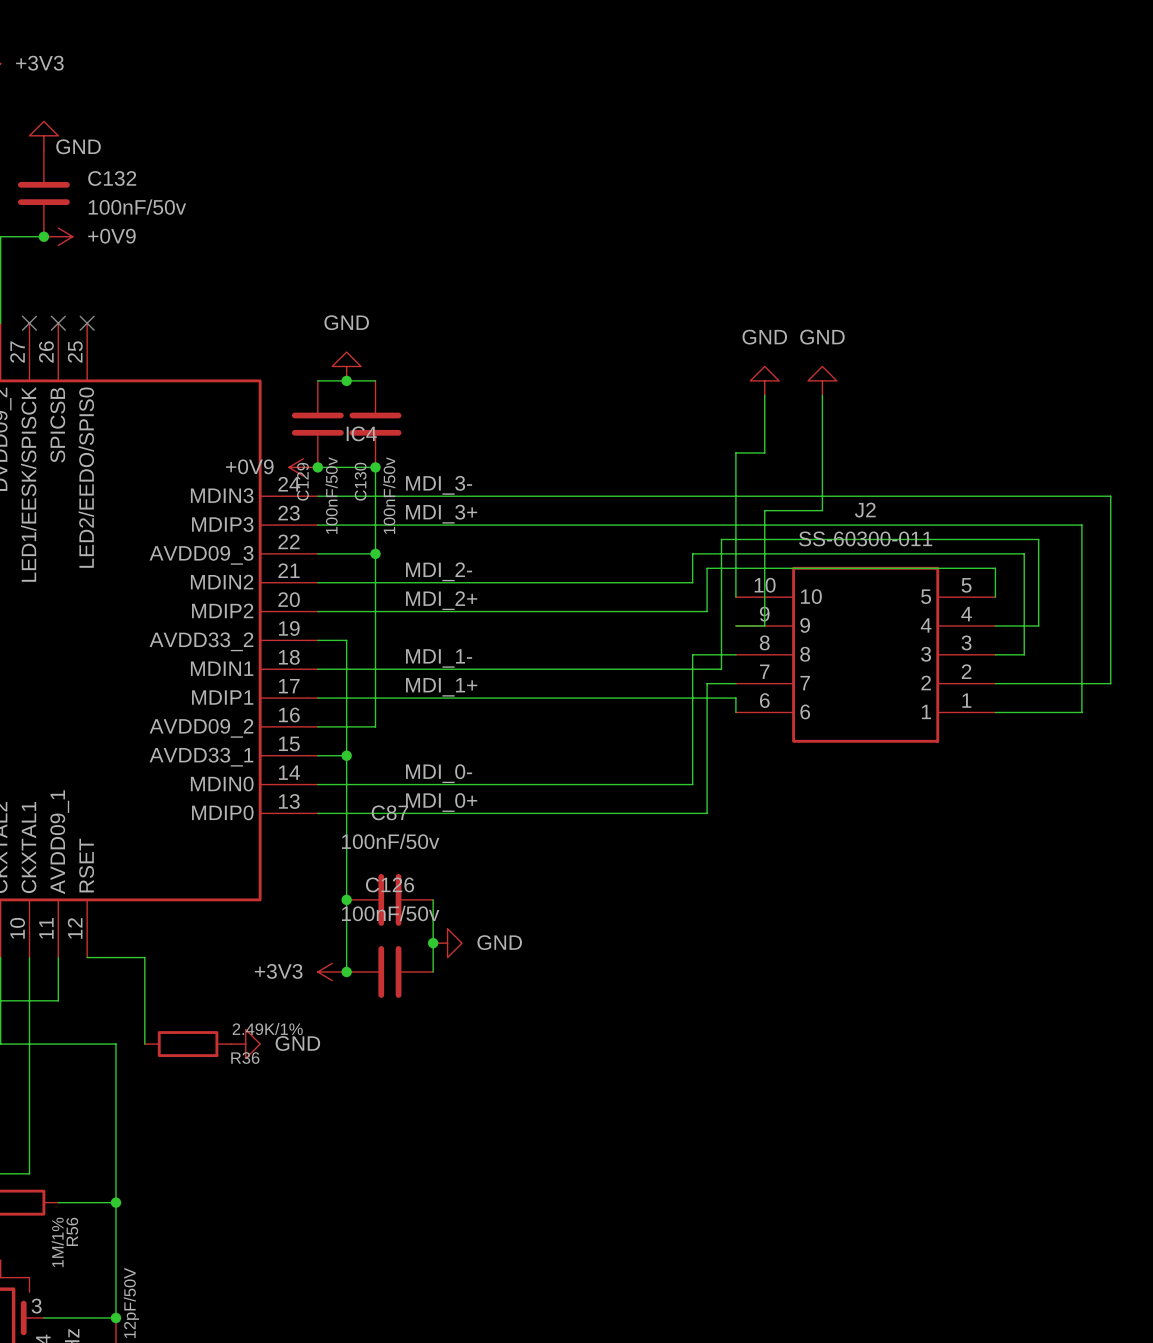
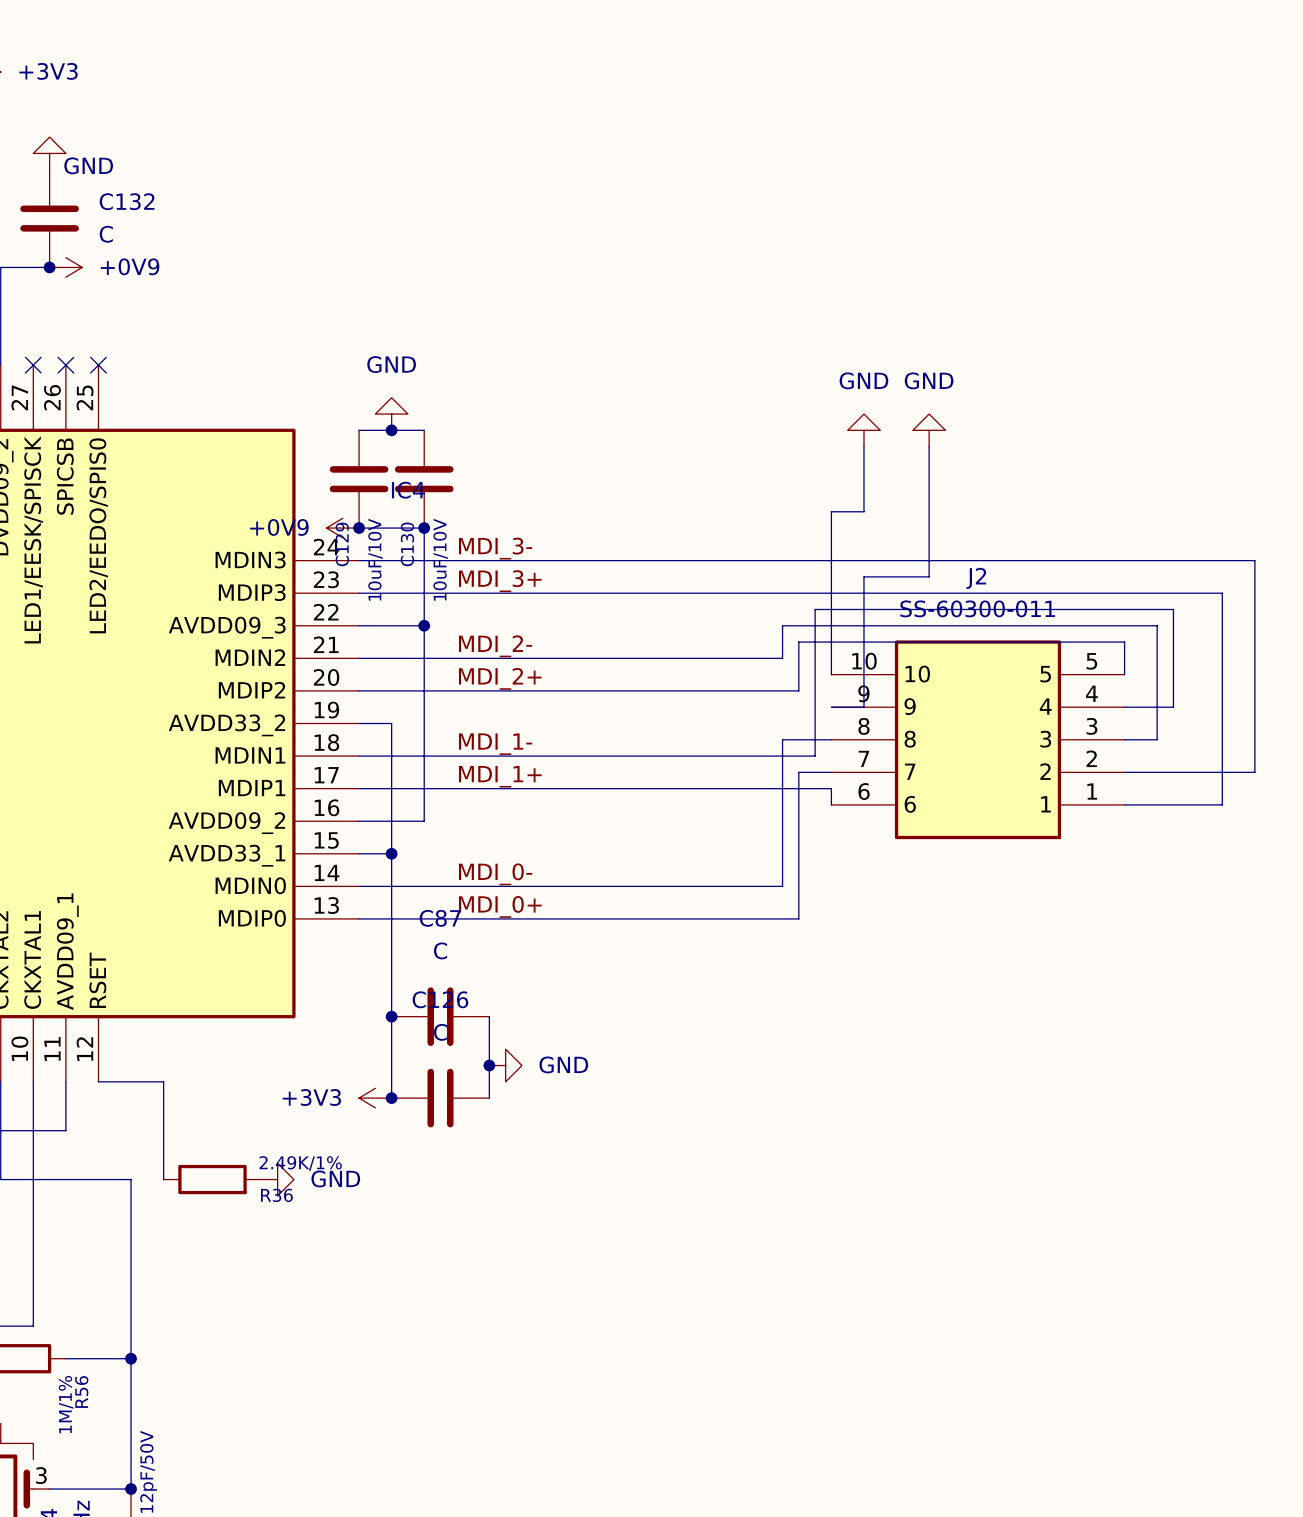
C132 value: 100nF/50v (137, 207) -> C (106, 234)
C129 value: 100nF/50v (331, 495) -> 10uF/10V (375, 559)
C130 value: 100nF/50v (389, 495) -> 10uF/10V (440, 559)
C87 value: 100nF/50v (390, 841) -> C (440, 950)
C126 value: 100nF/50v (390, 913) -> C (440, 1032)

